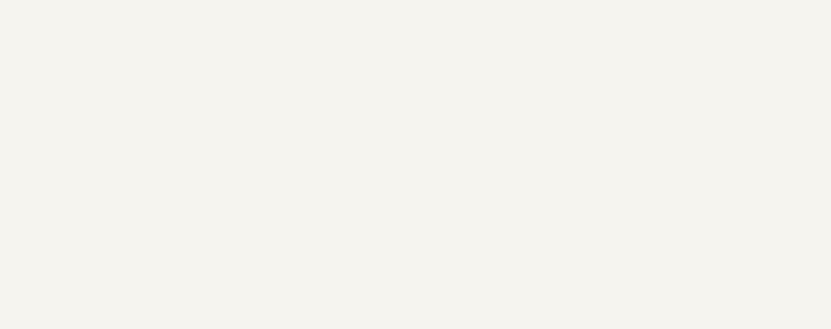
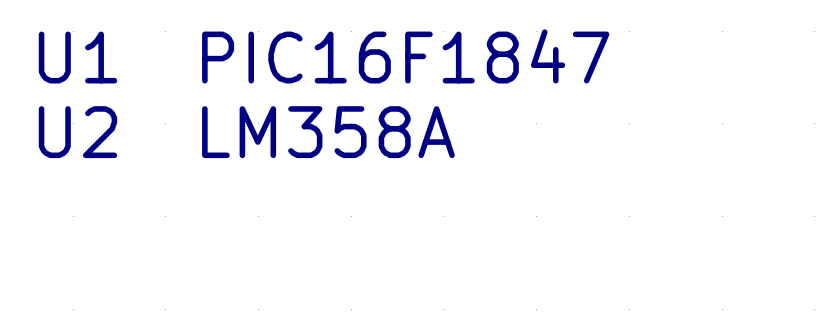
text: none -> U1 PIC16F1847 (324, 56)
text: none -> U2 LM358A (246, 132)

